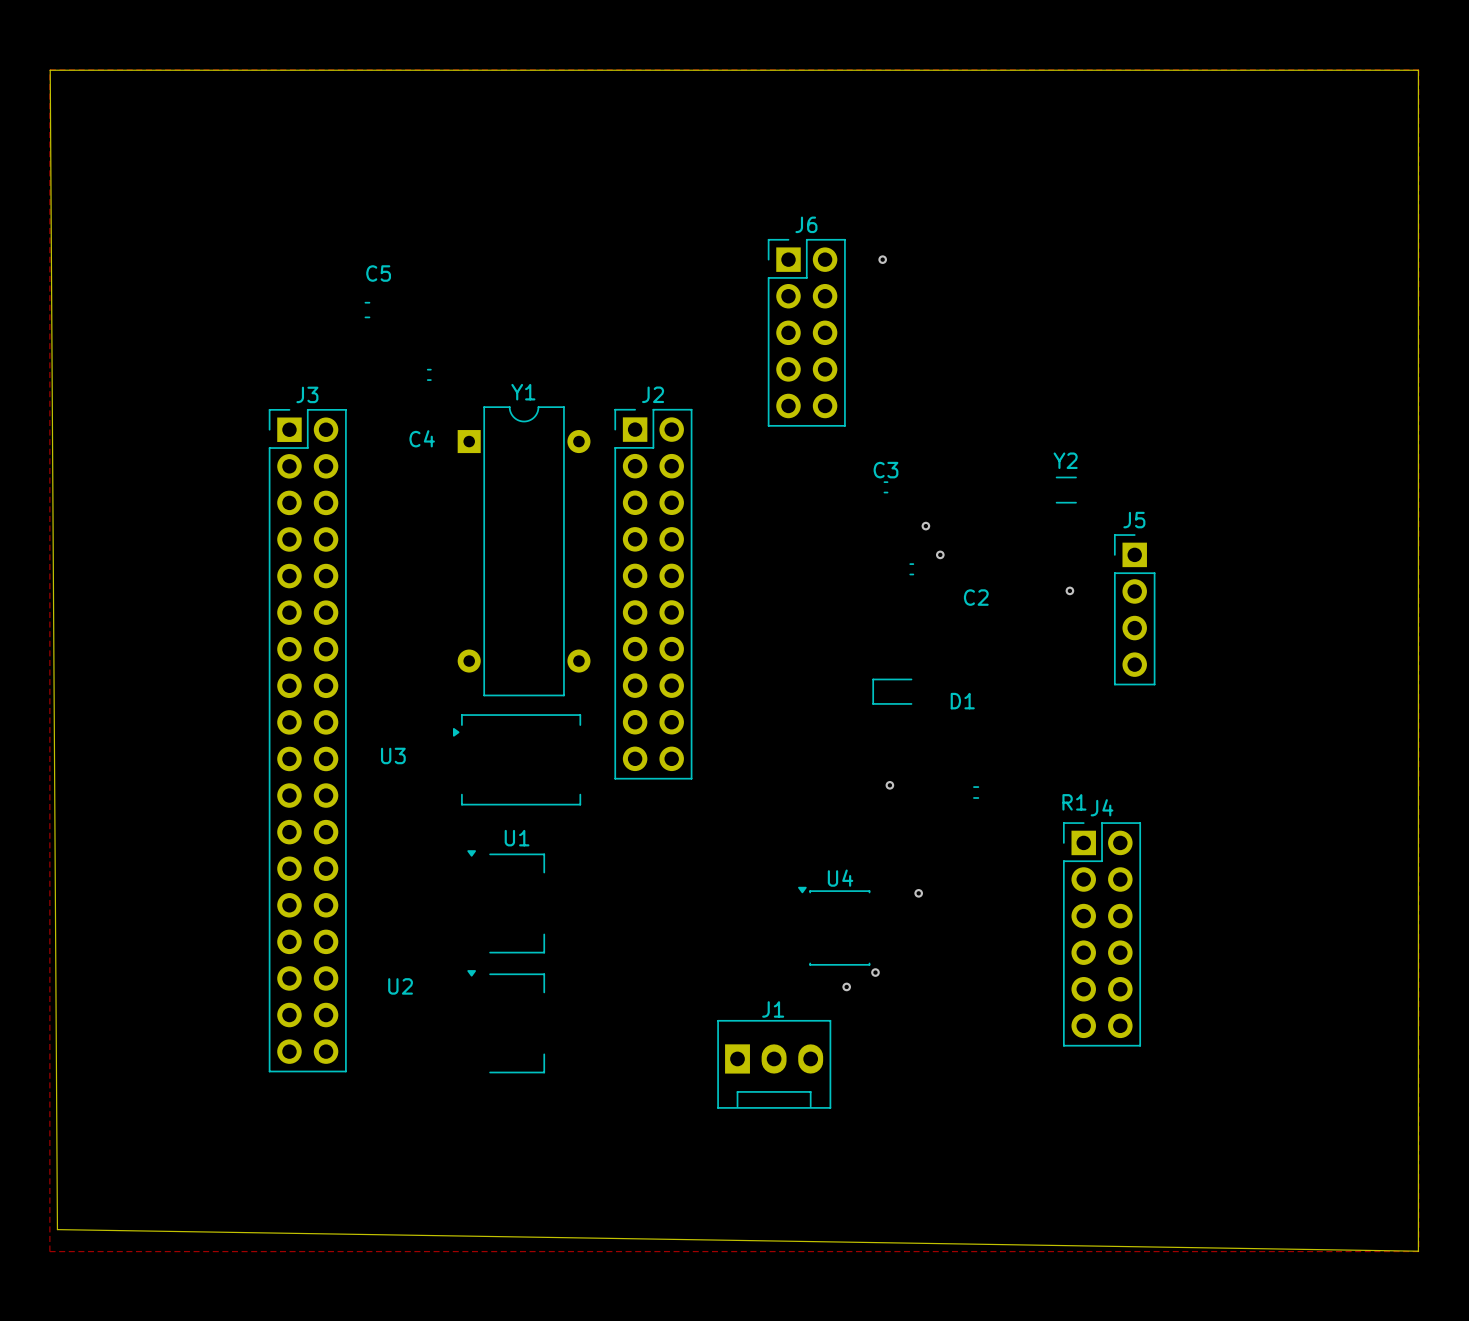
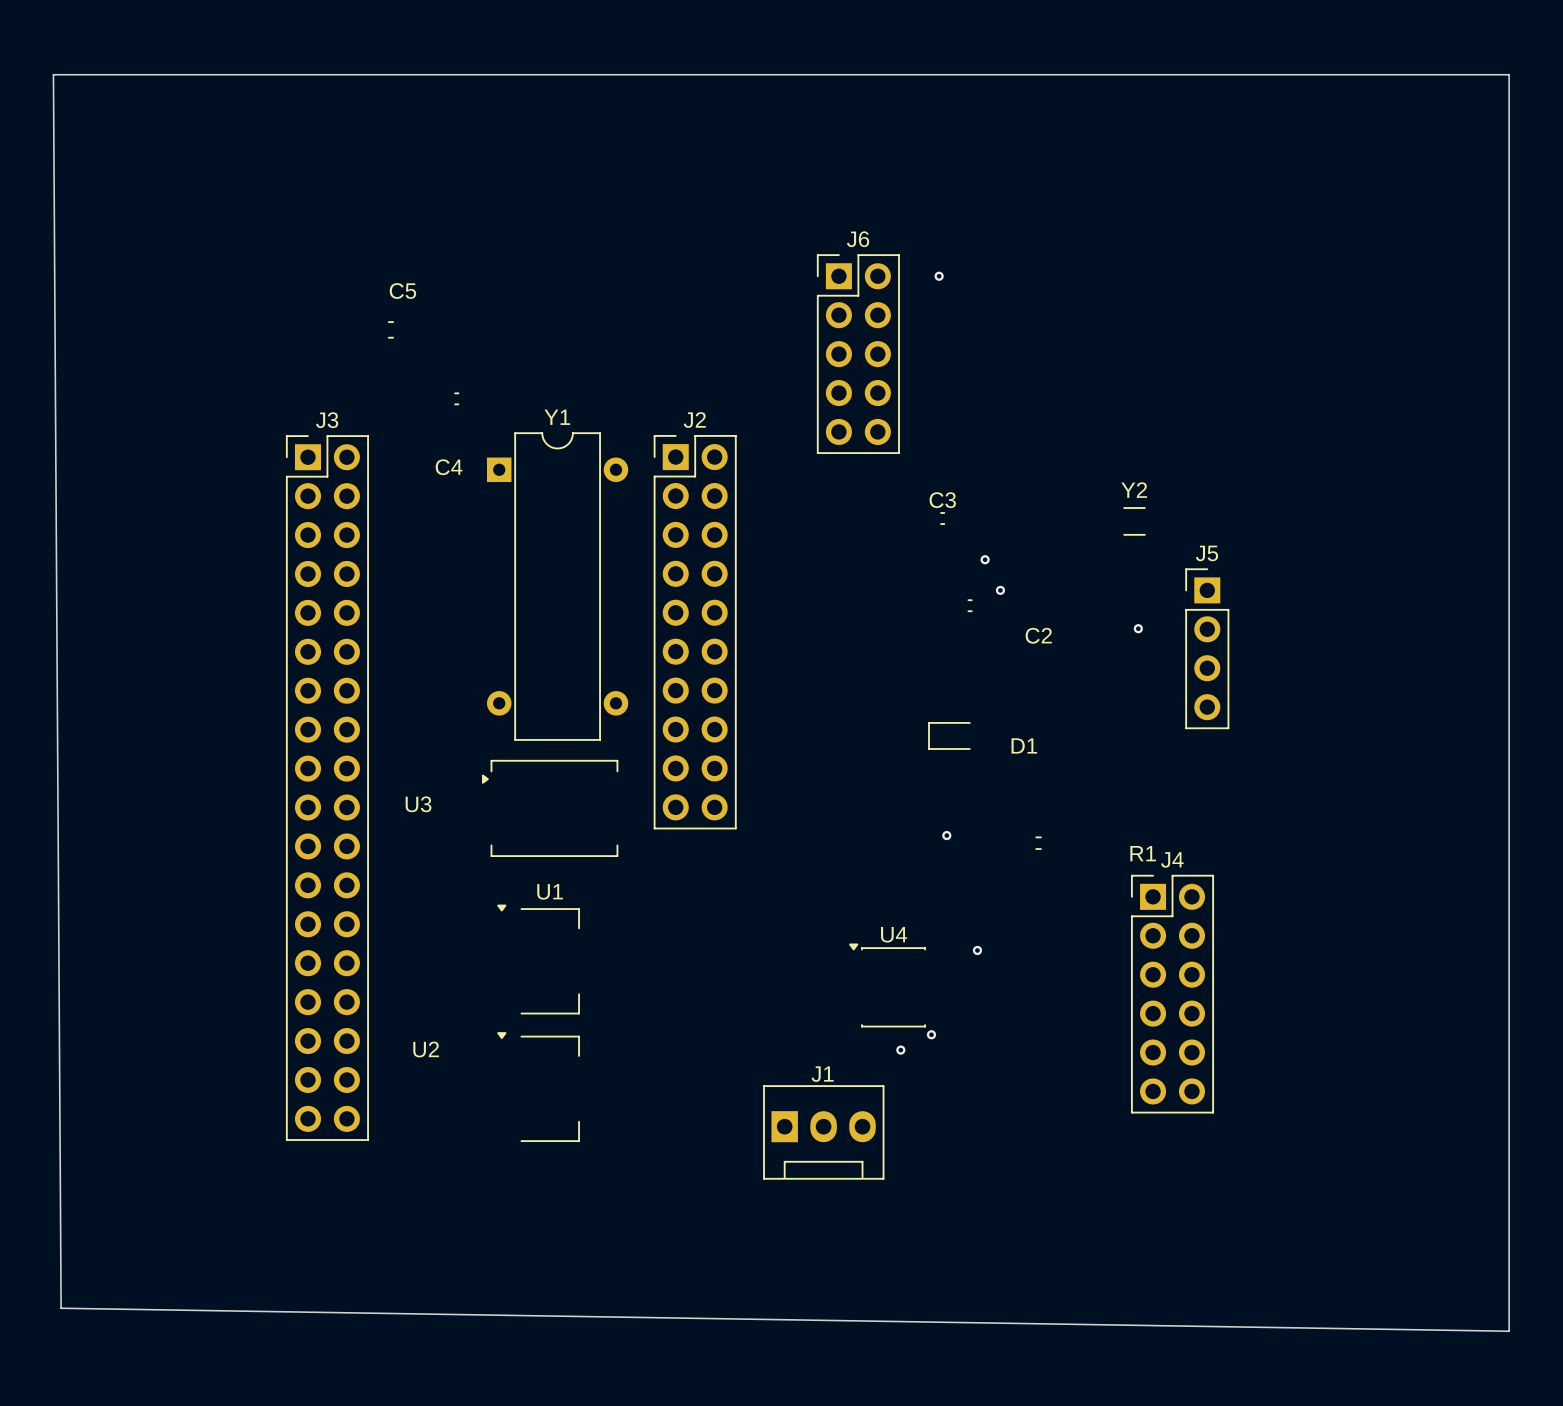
zone outline: (49, 69) (1418, 69) (1418, 1251) (49, 1251) (49, 69) -> none

